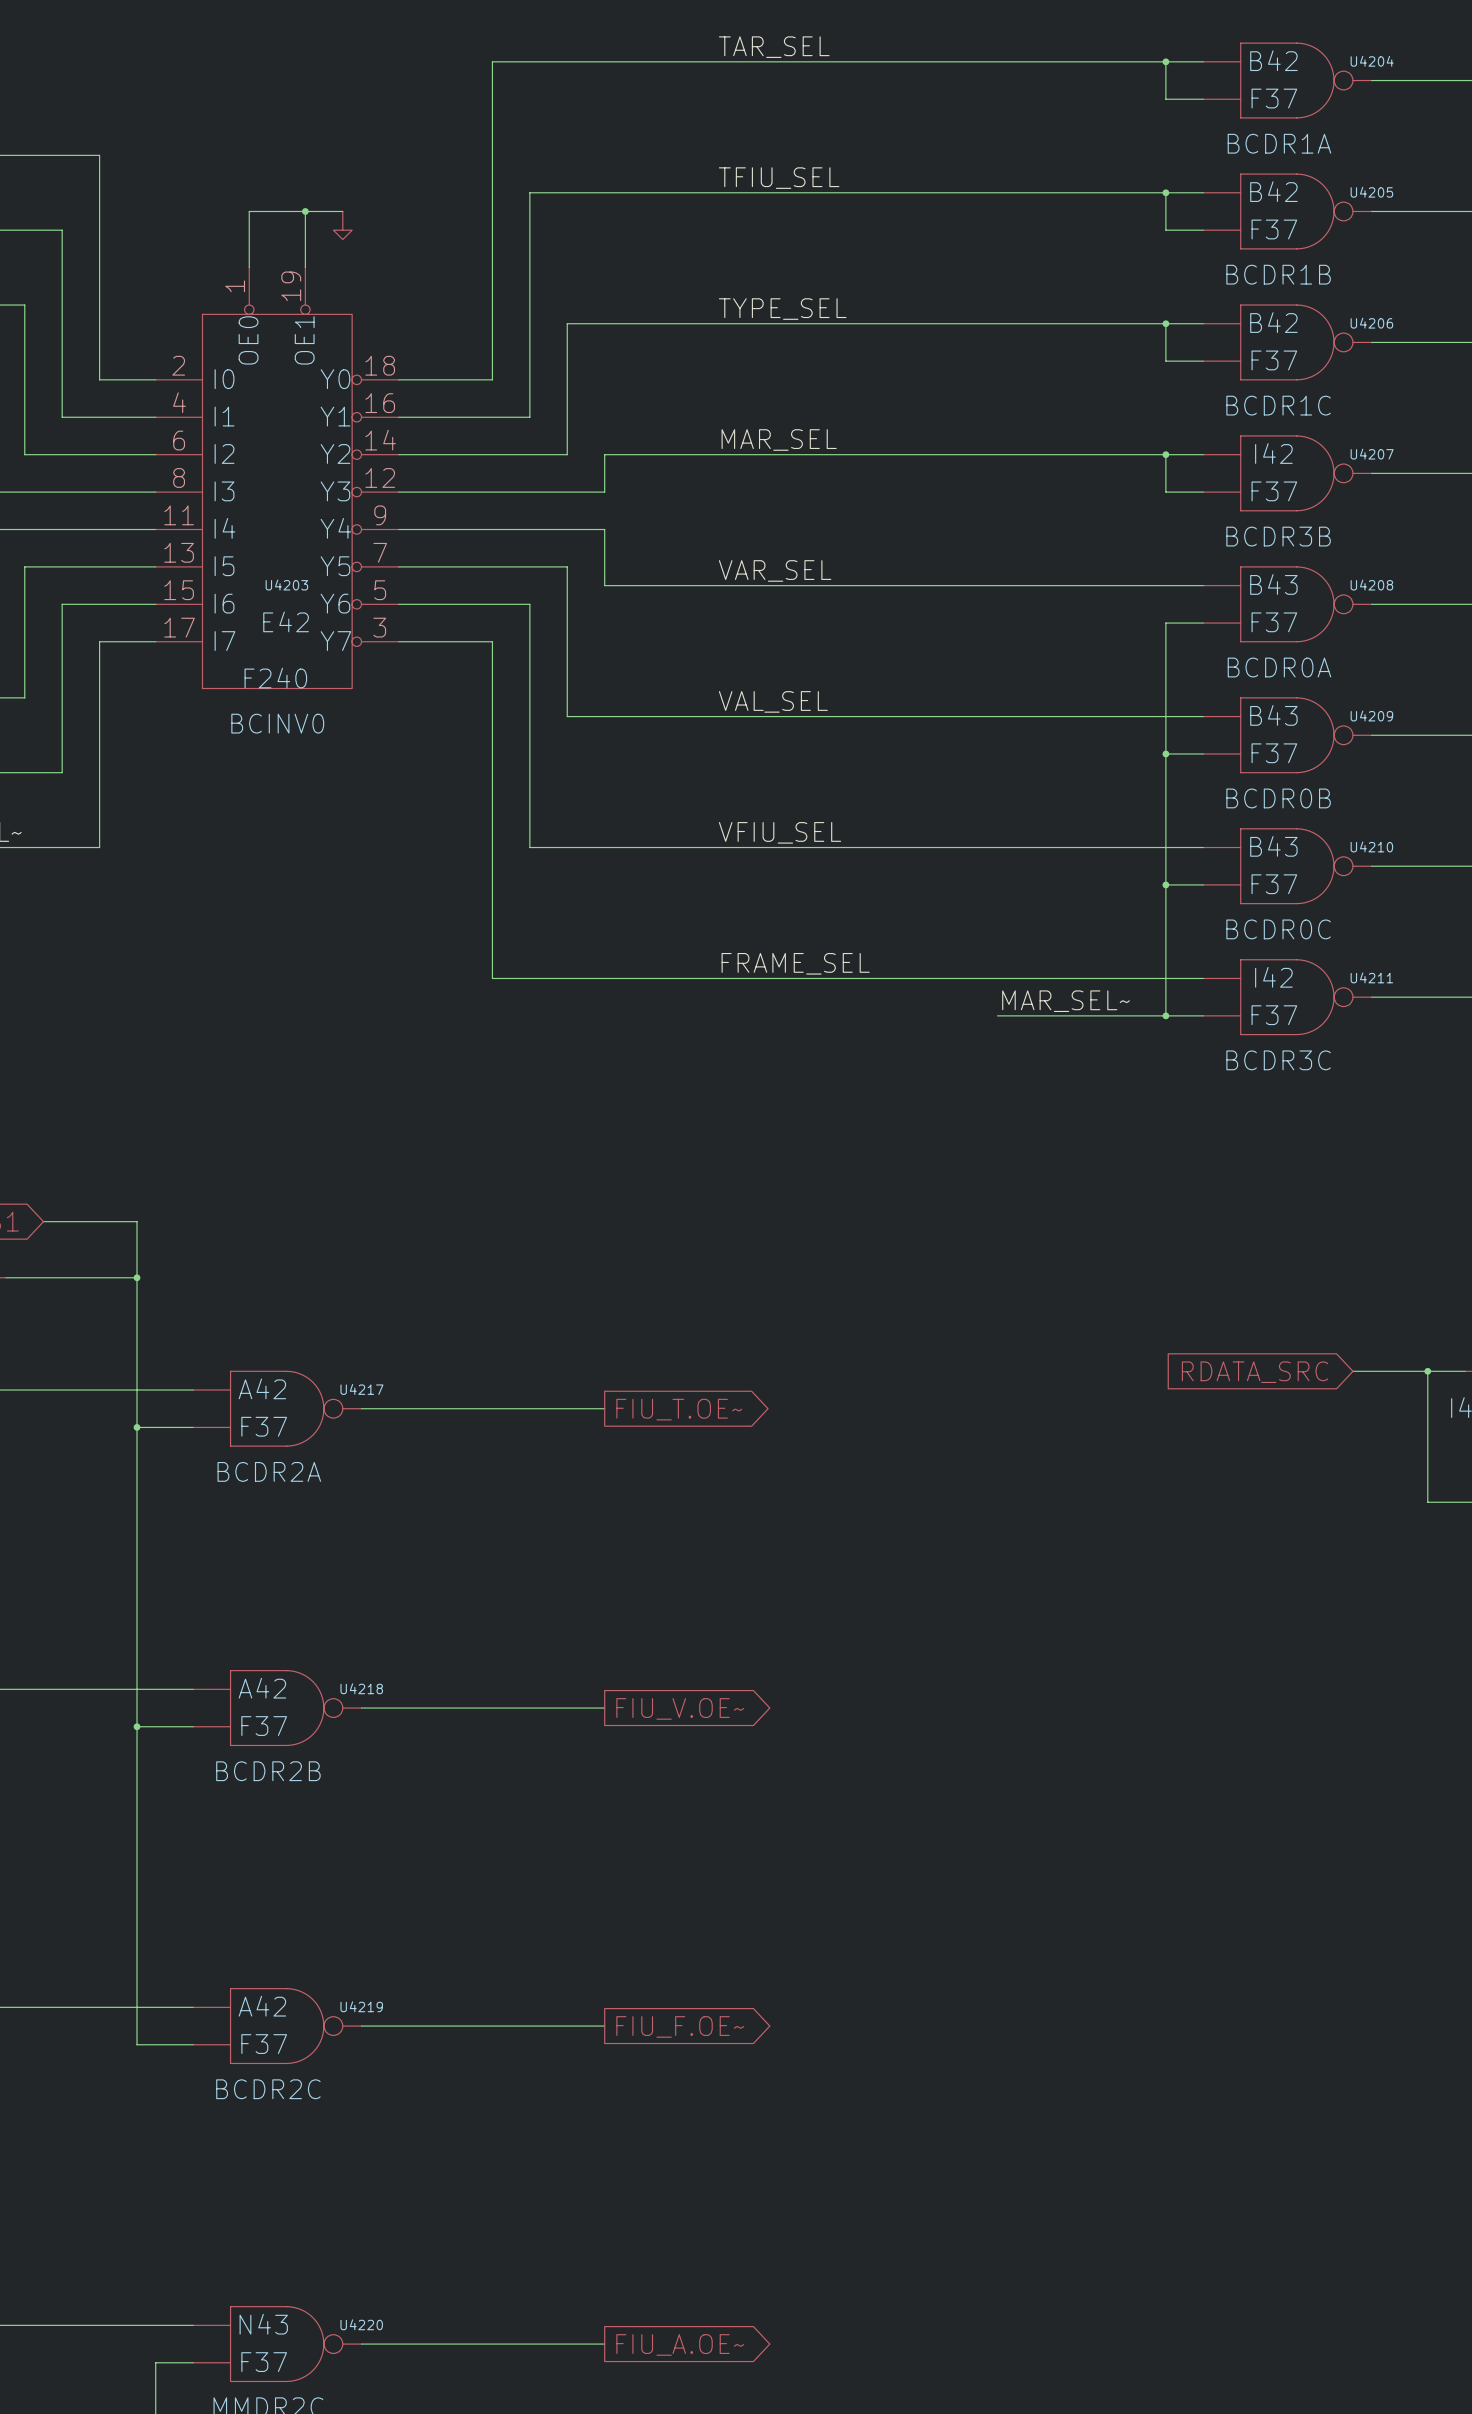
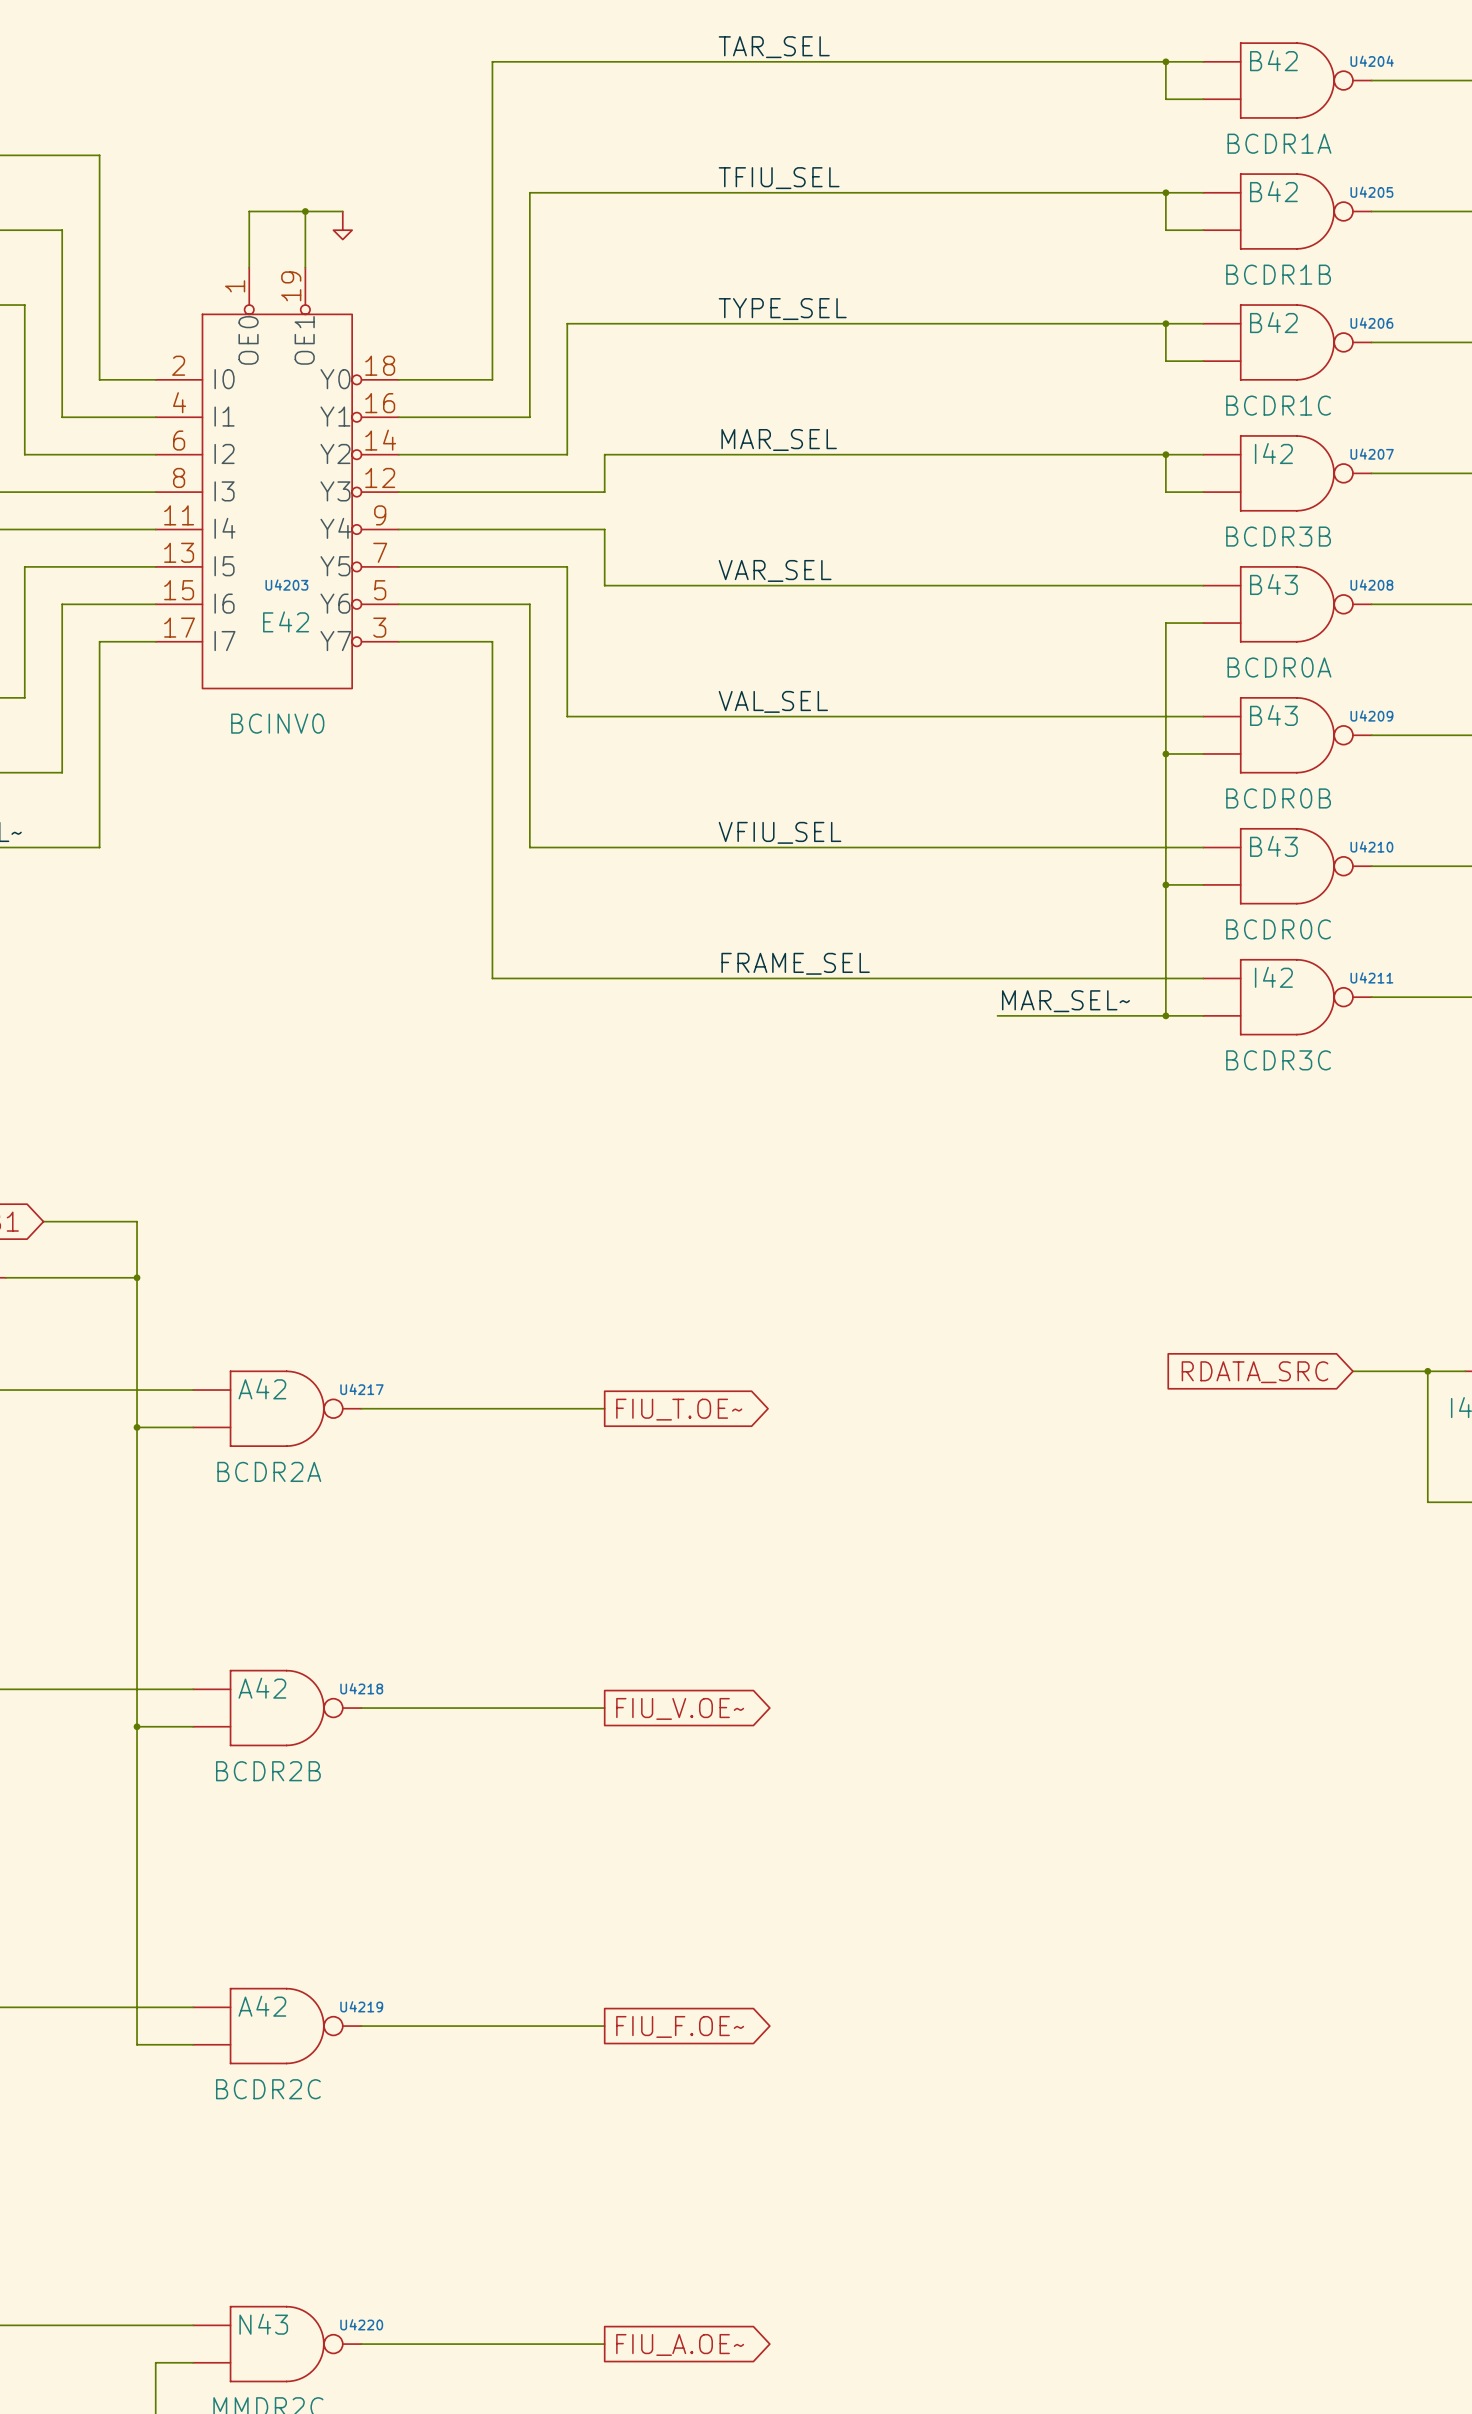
U4204 value: F37 (1274, 98) -> none
U4205 value: F37 (1274, 229) -> none
U4206 value: F37 (1274, 360) -> none
U4207 value: F37 (1274, 491) -> none
U4208 value: F37 (1274, 622) -> none
U4203 value: F240 (275, 678) -> none
U4209 value: F37 (1274, 753) -> none
U4210 value: F37 (1274, 884) -> none
U4211 value: F37 (1274, 1015) -> none
U4217 value: F37 (264, 1426) -> none
U4218 value: F37 (264, 1726) -> none
U4219 value: F37 (264, 2044) -> none
U4220 value: F37 (264, 2362) -> none

